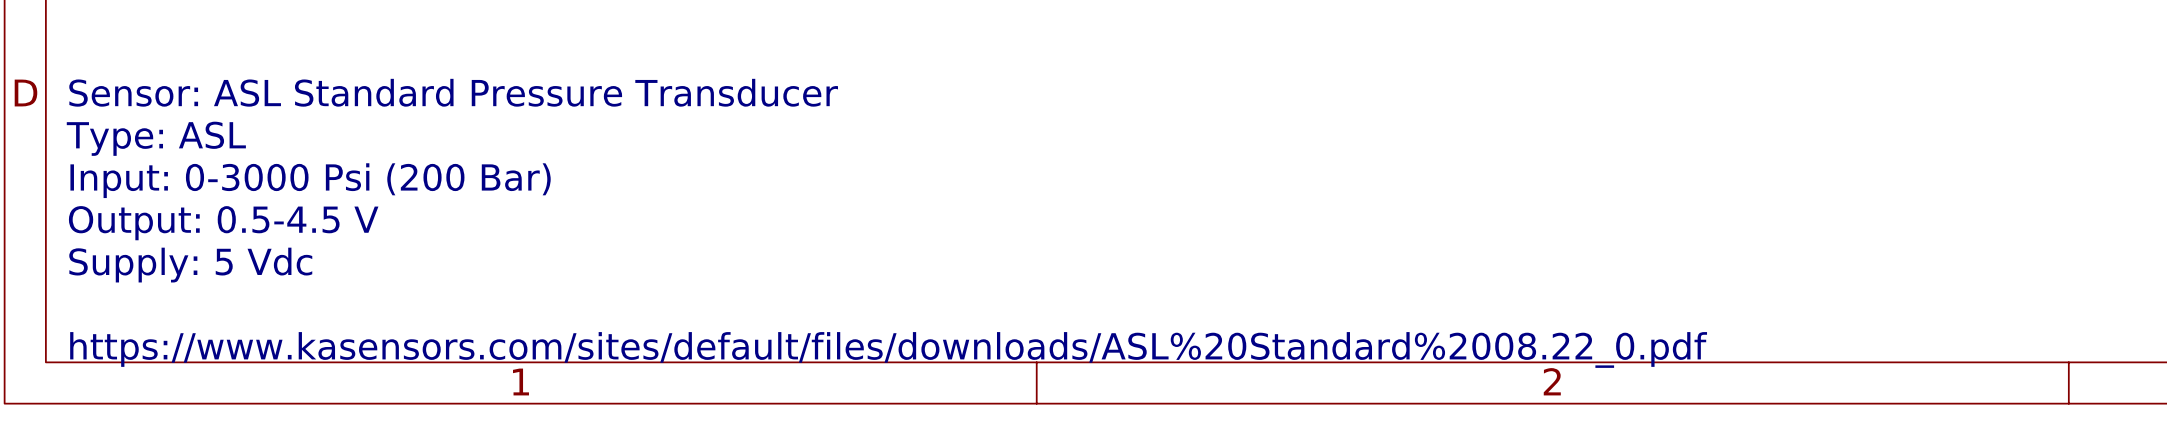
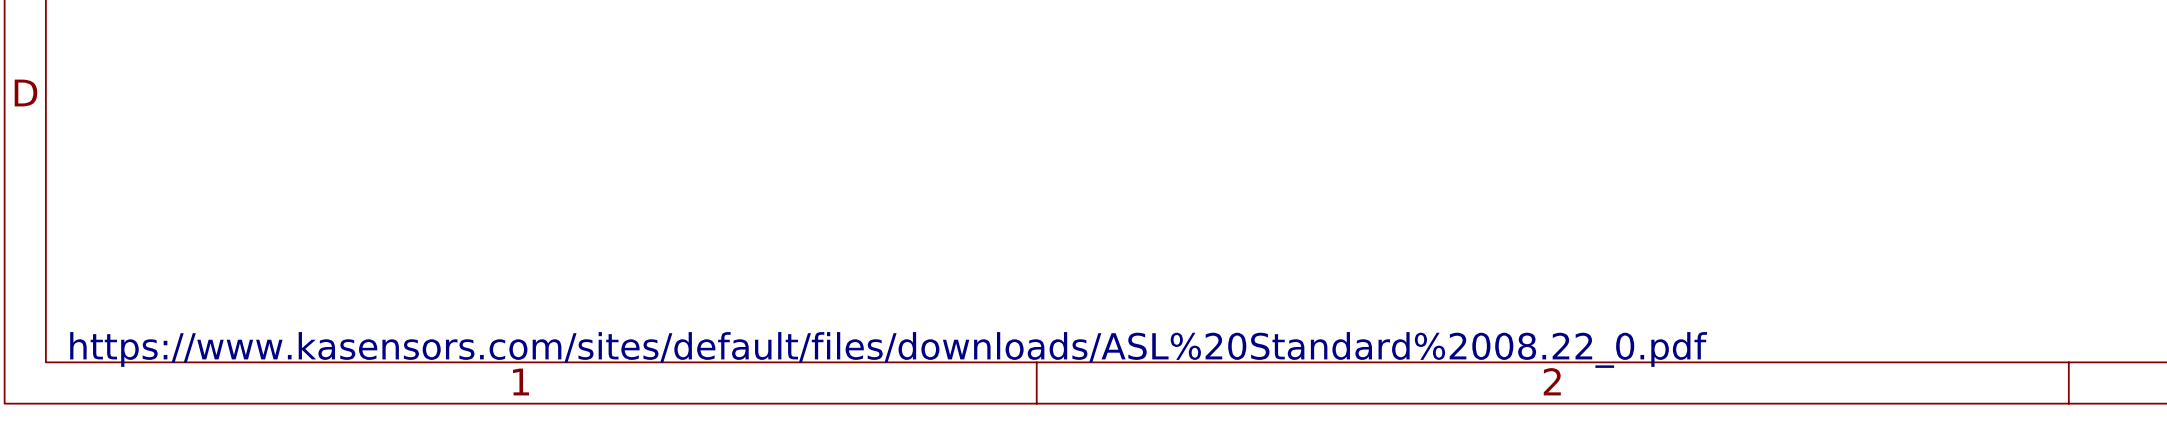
text: Sensor: ASL Standard Pressure Transducer (453, 92) -> none
text: Type: ASL (156, 138) -> none
text: Input: 0-3000 Psi (200 Bar) (310, 180) -> none
text: Output: 0.5-4.5 V (223, 223) -> none
text: Supply: 5 Vdc (190, 265) -> none

